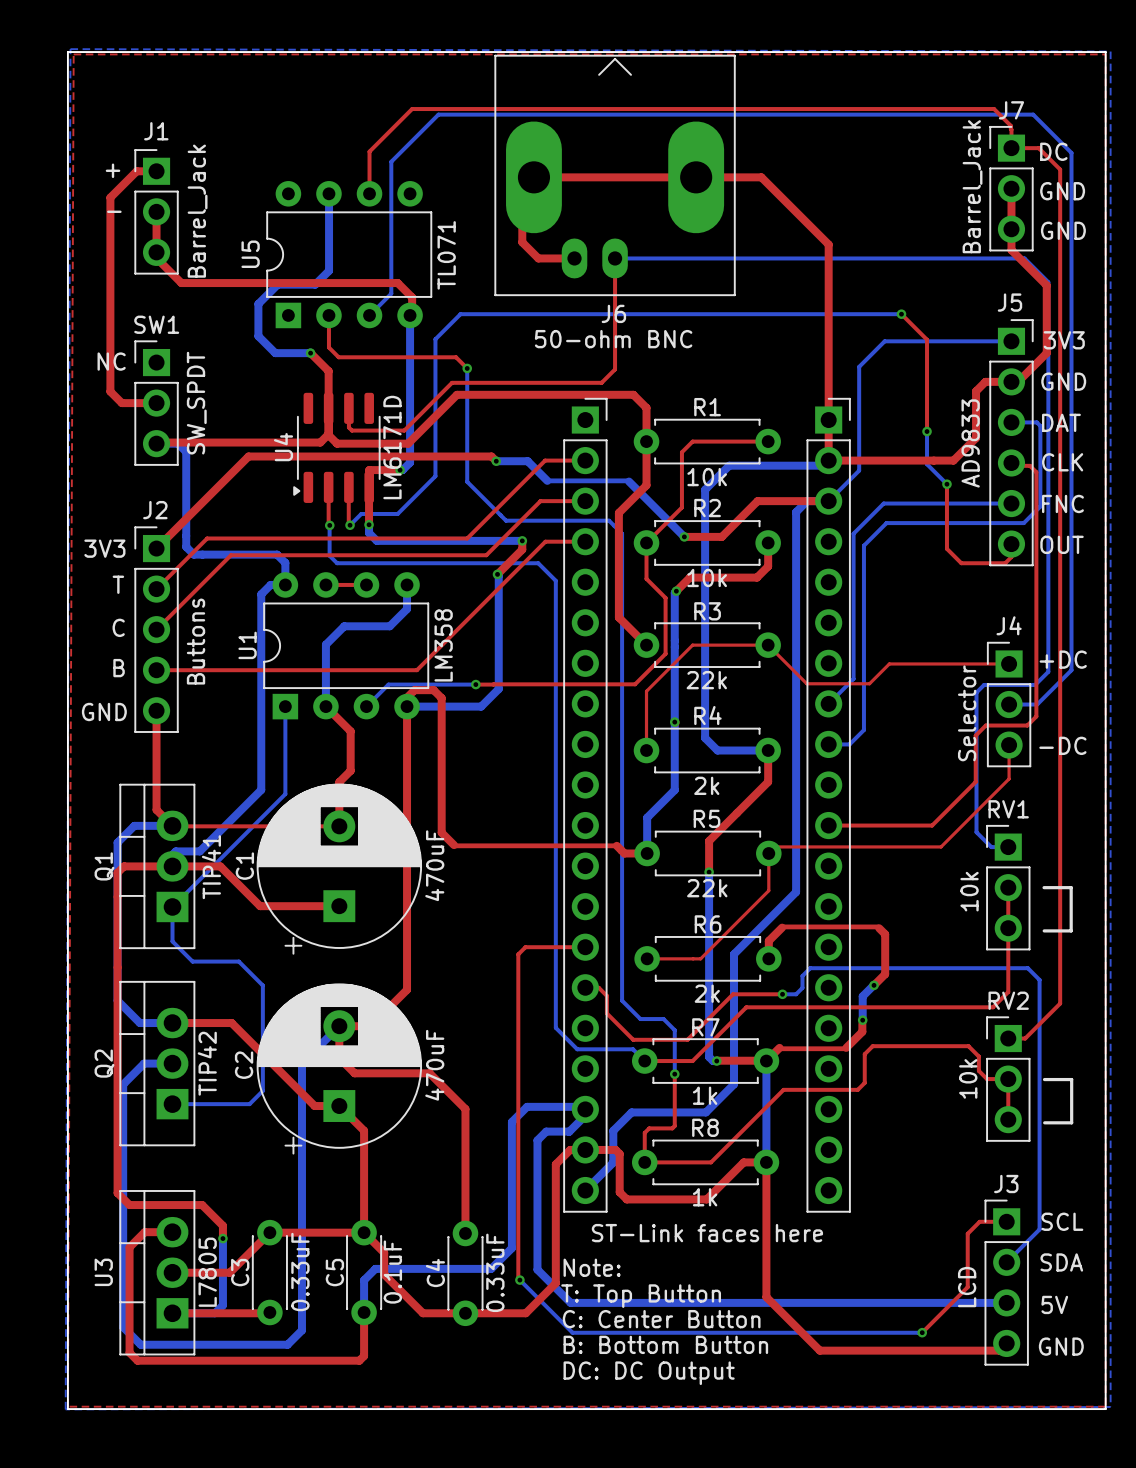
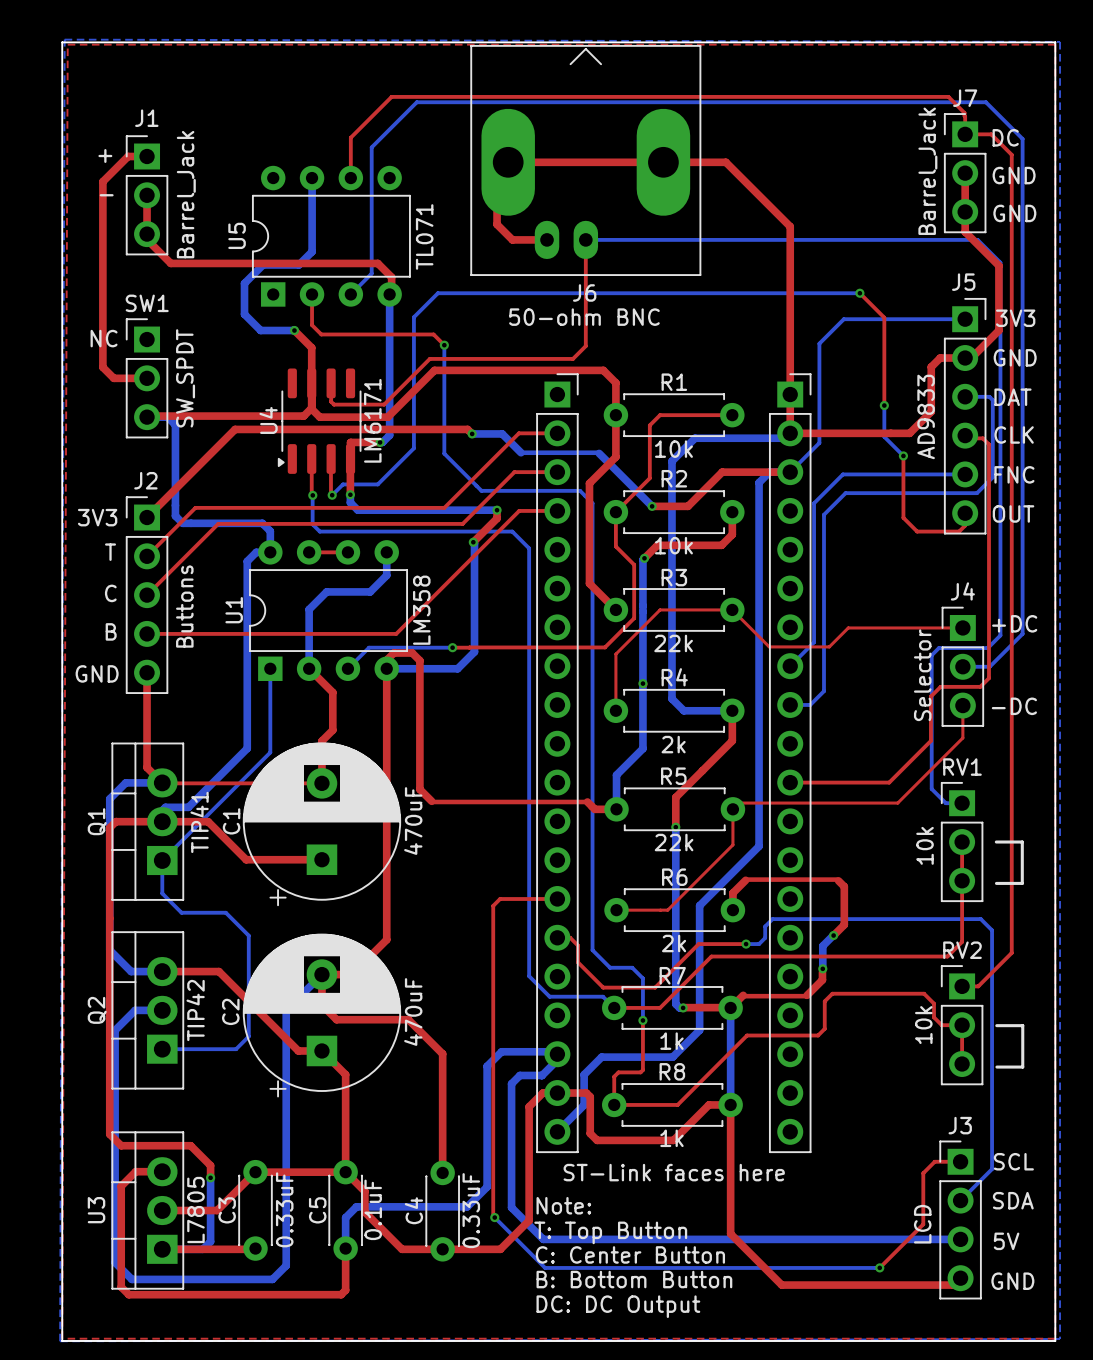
U4 value: LM6171D (392, 447) -> LM6171 (372, 420)

